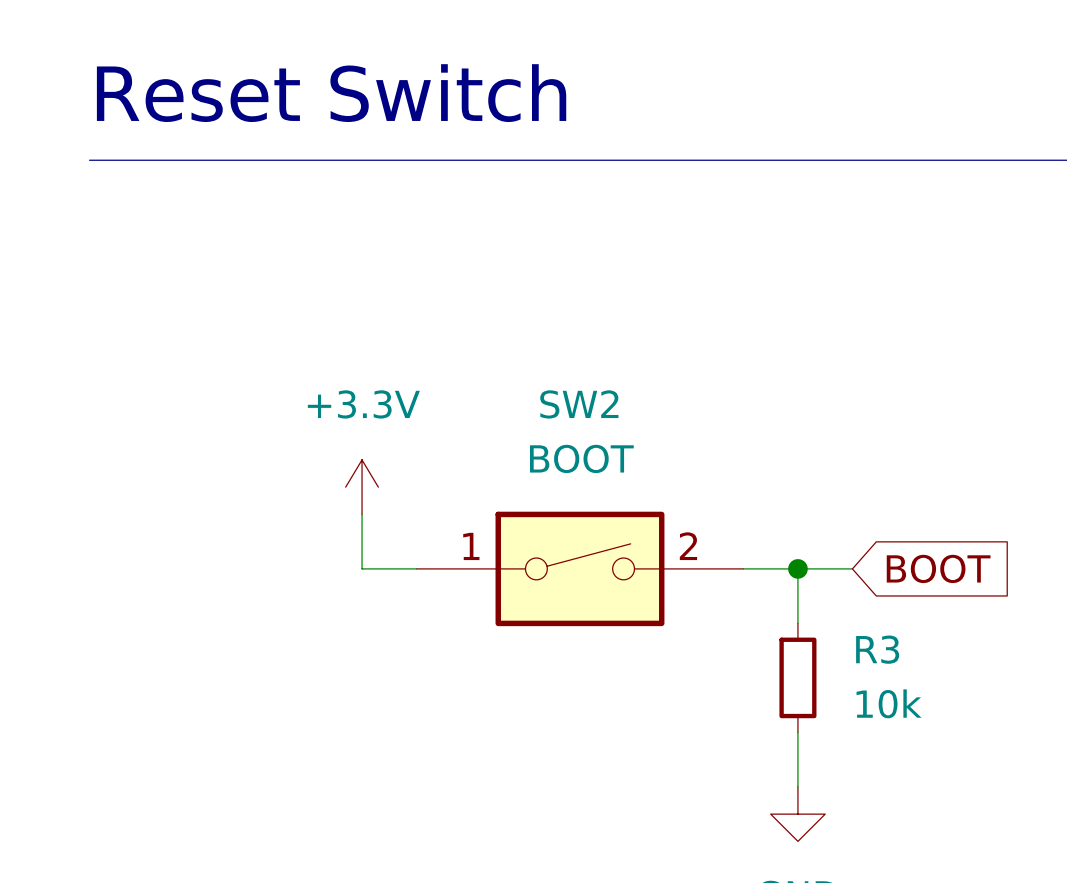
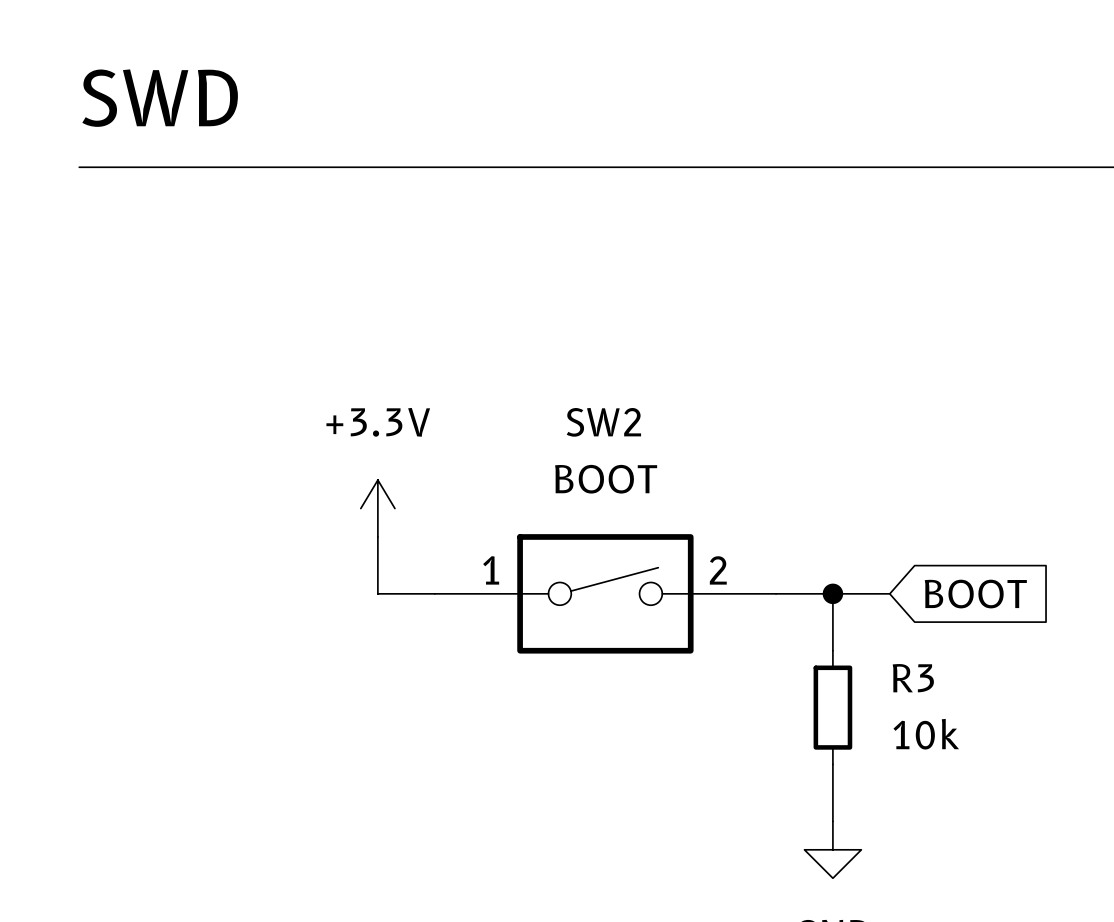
text: Reset Switch (331, 93) -> SWD (160, 98)
line: none -> (79, 167) (93, 167)

